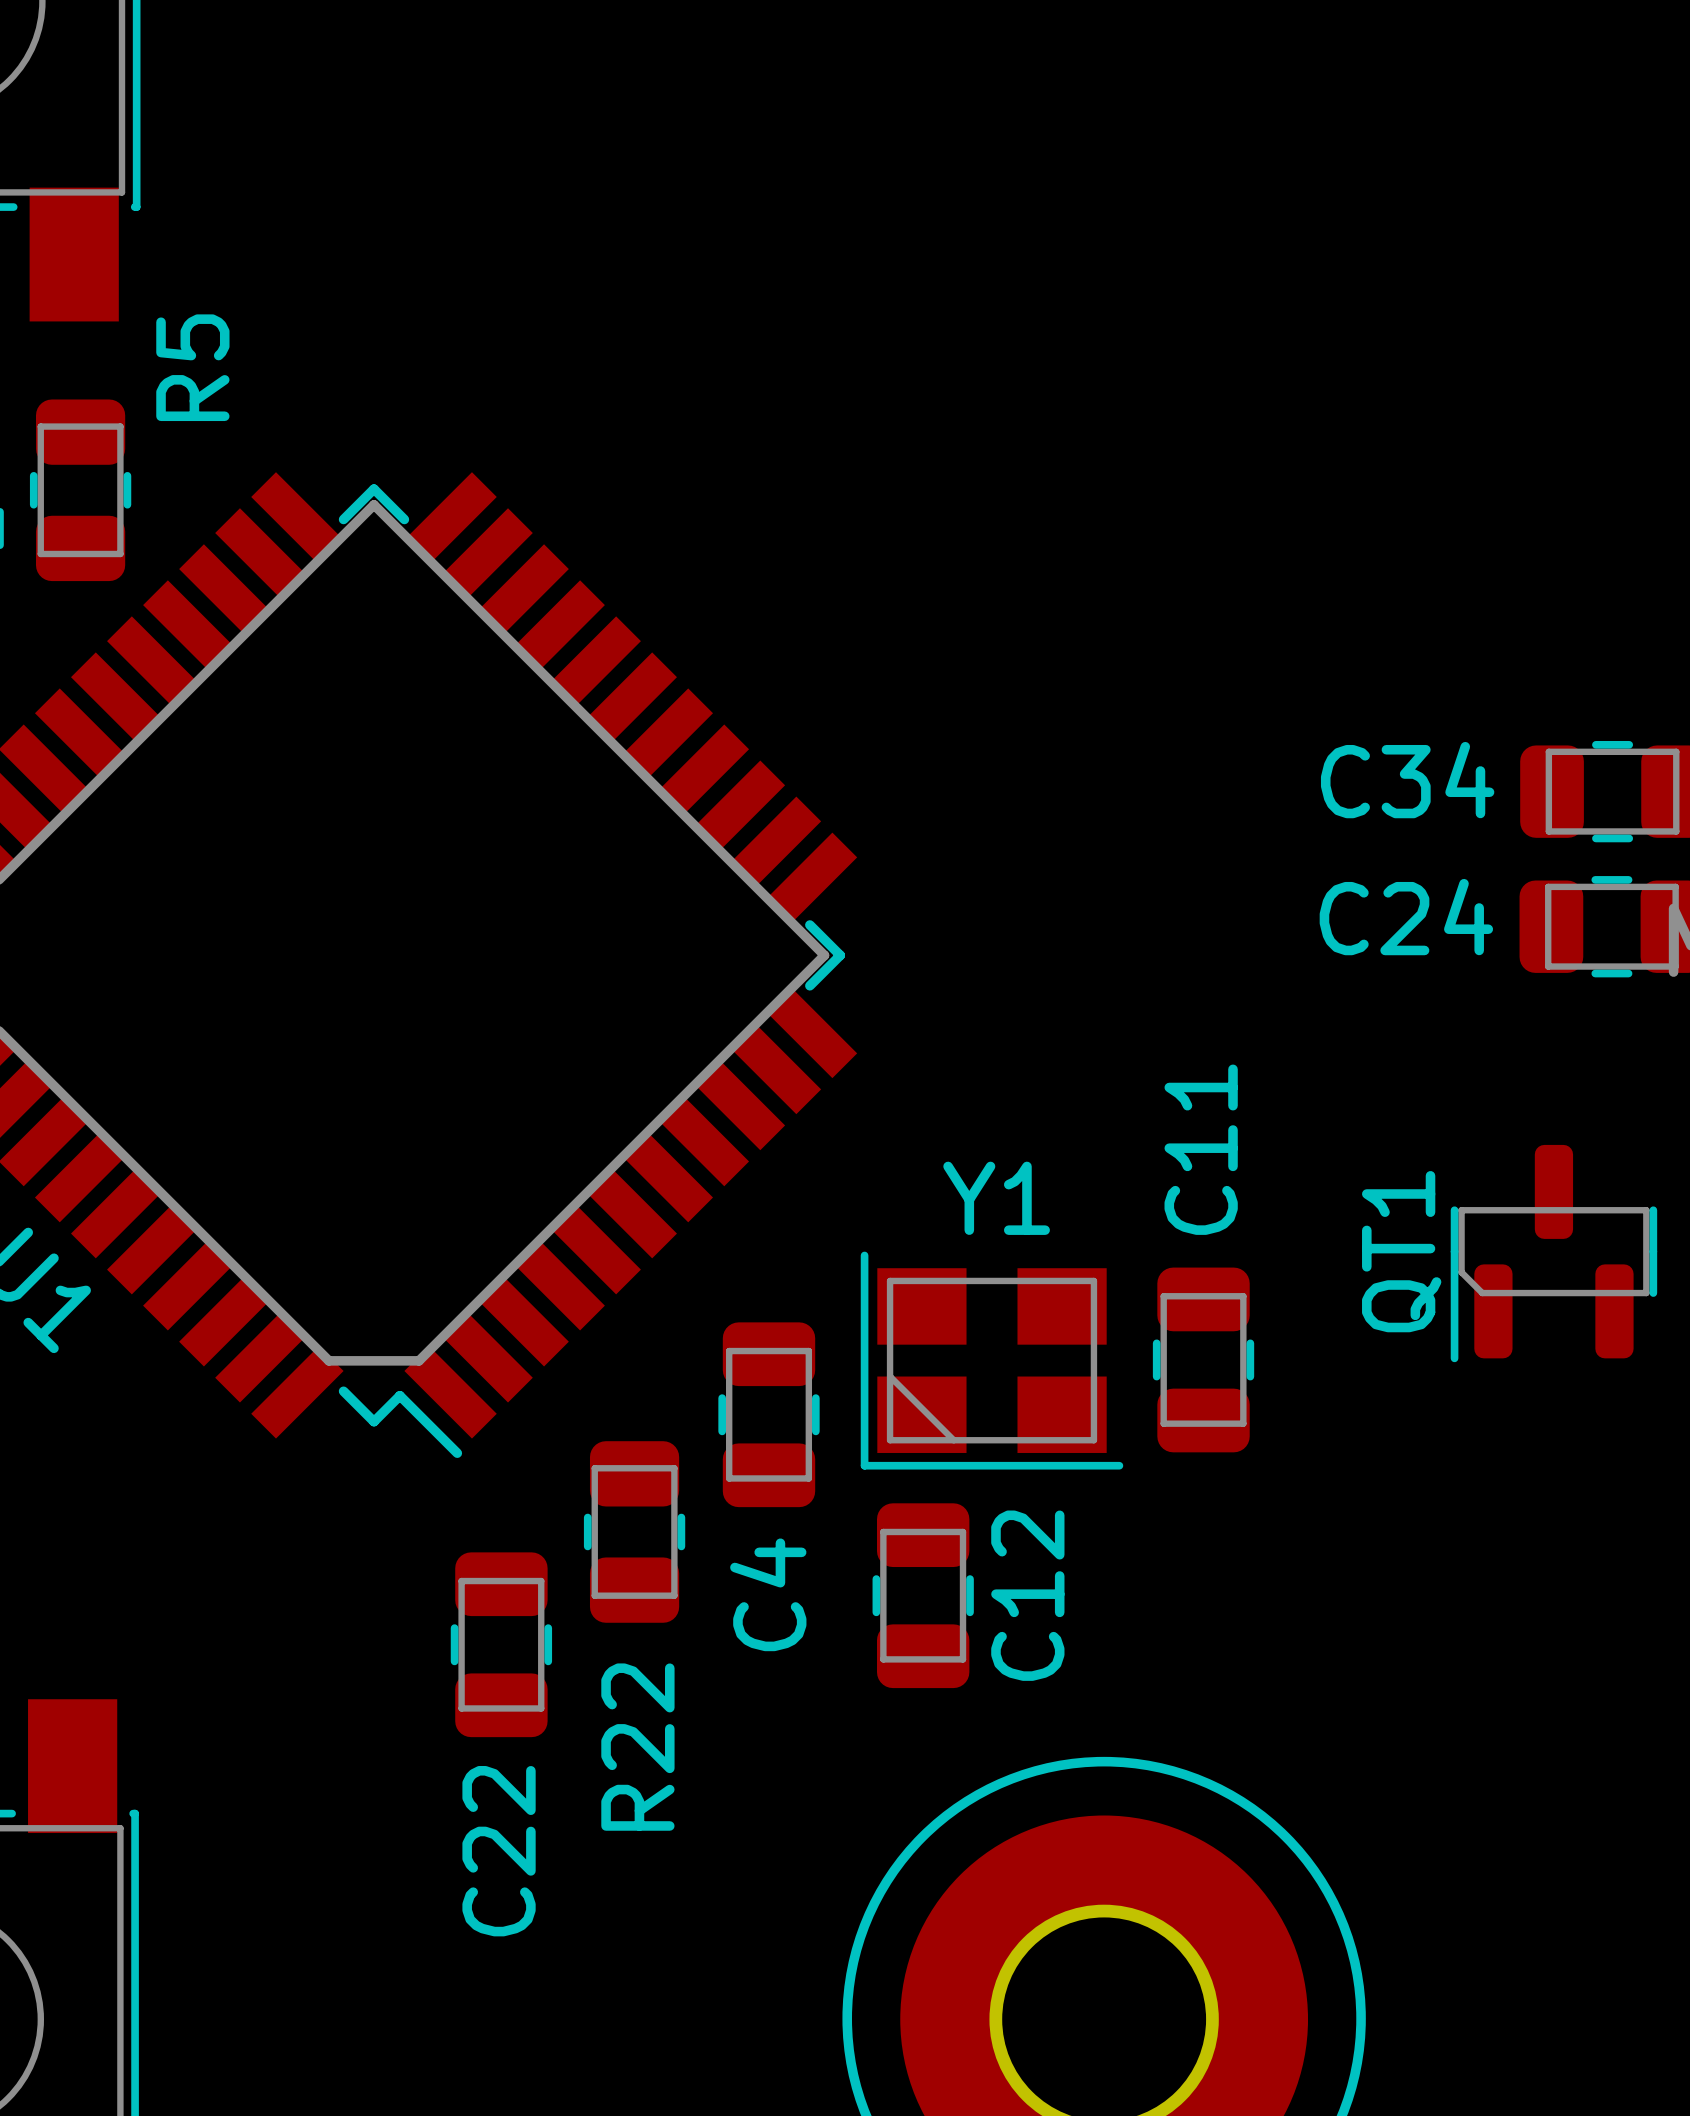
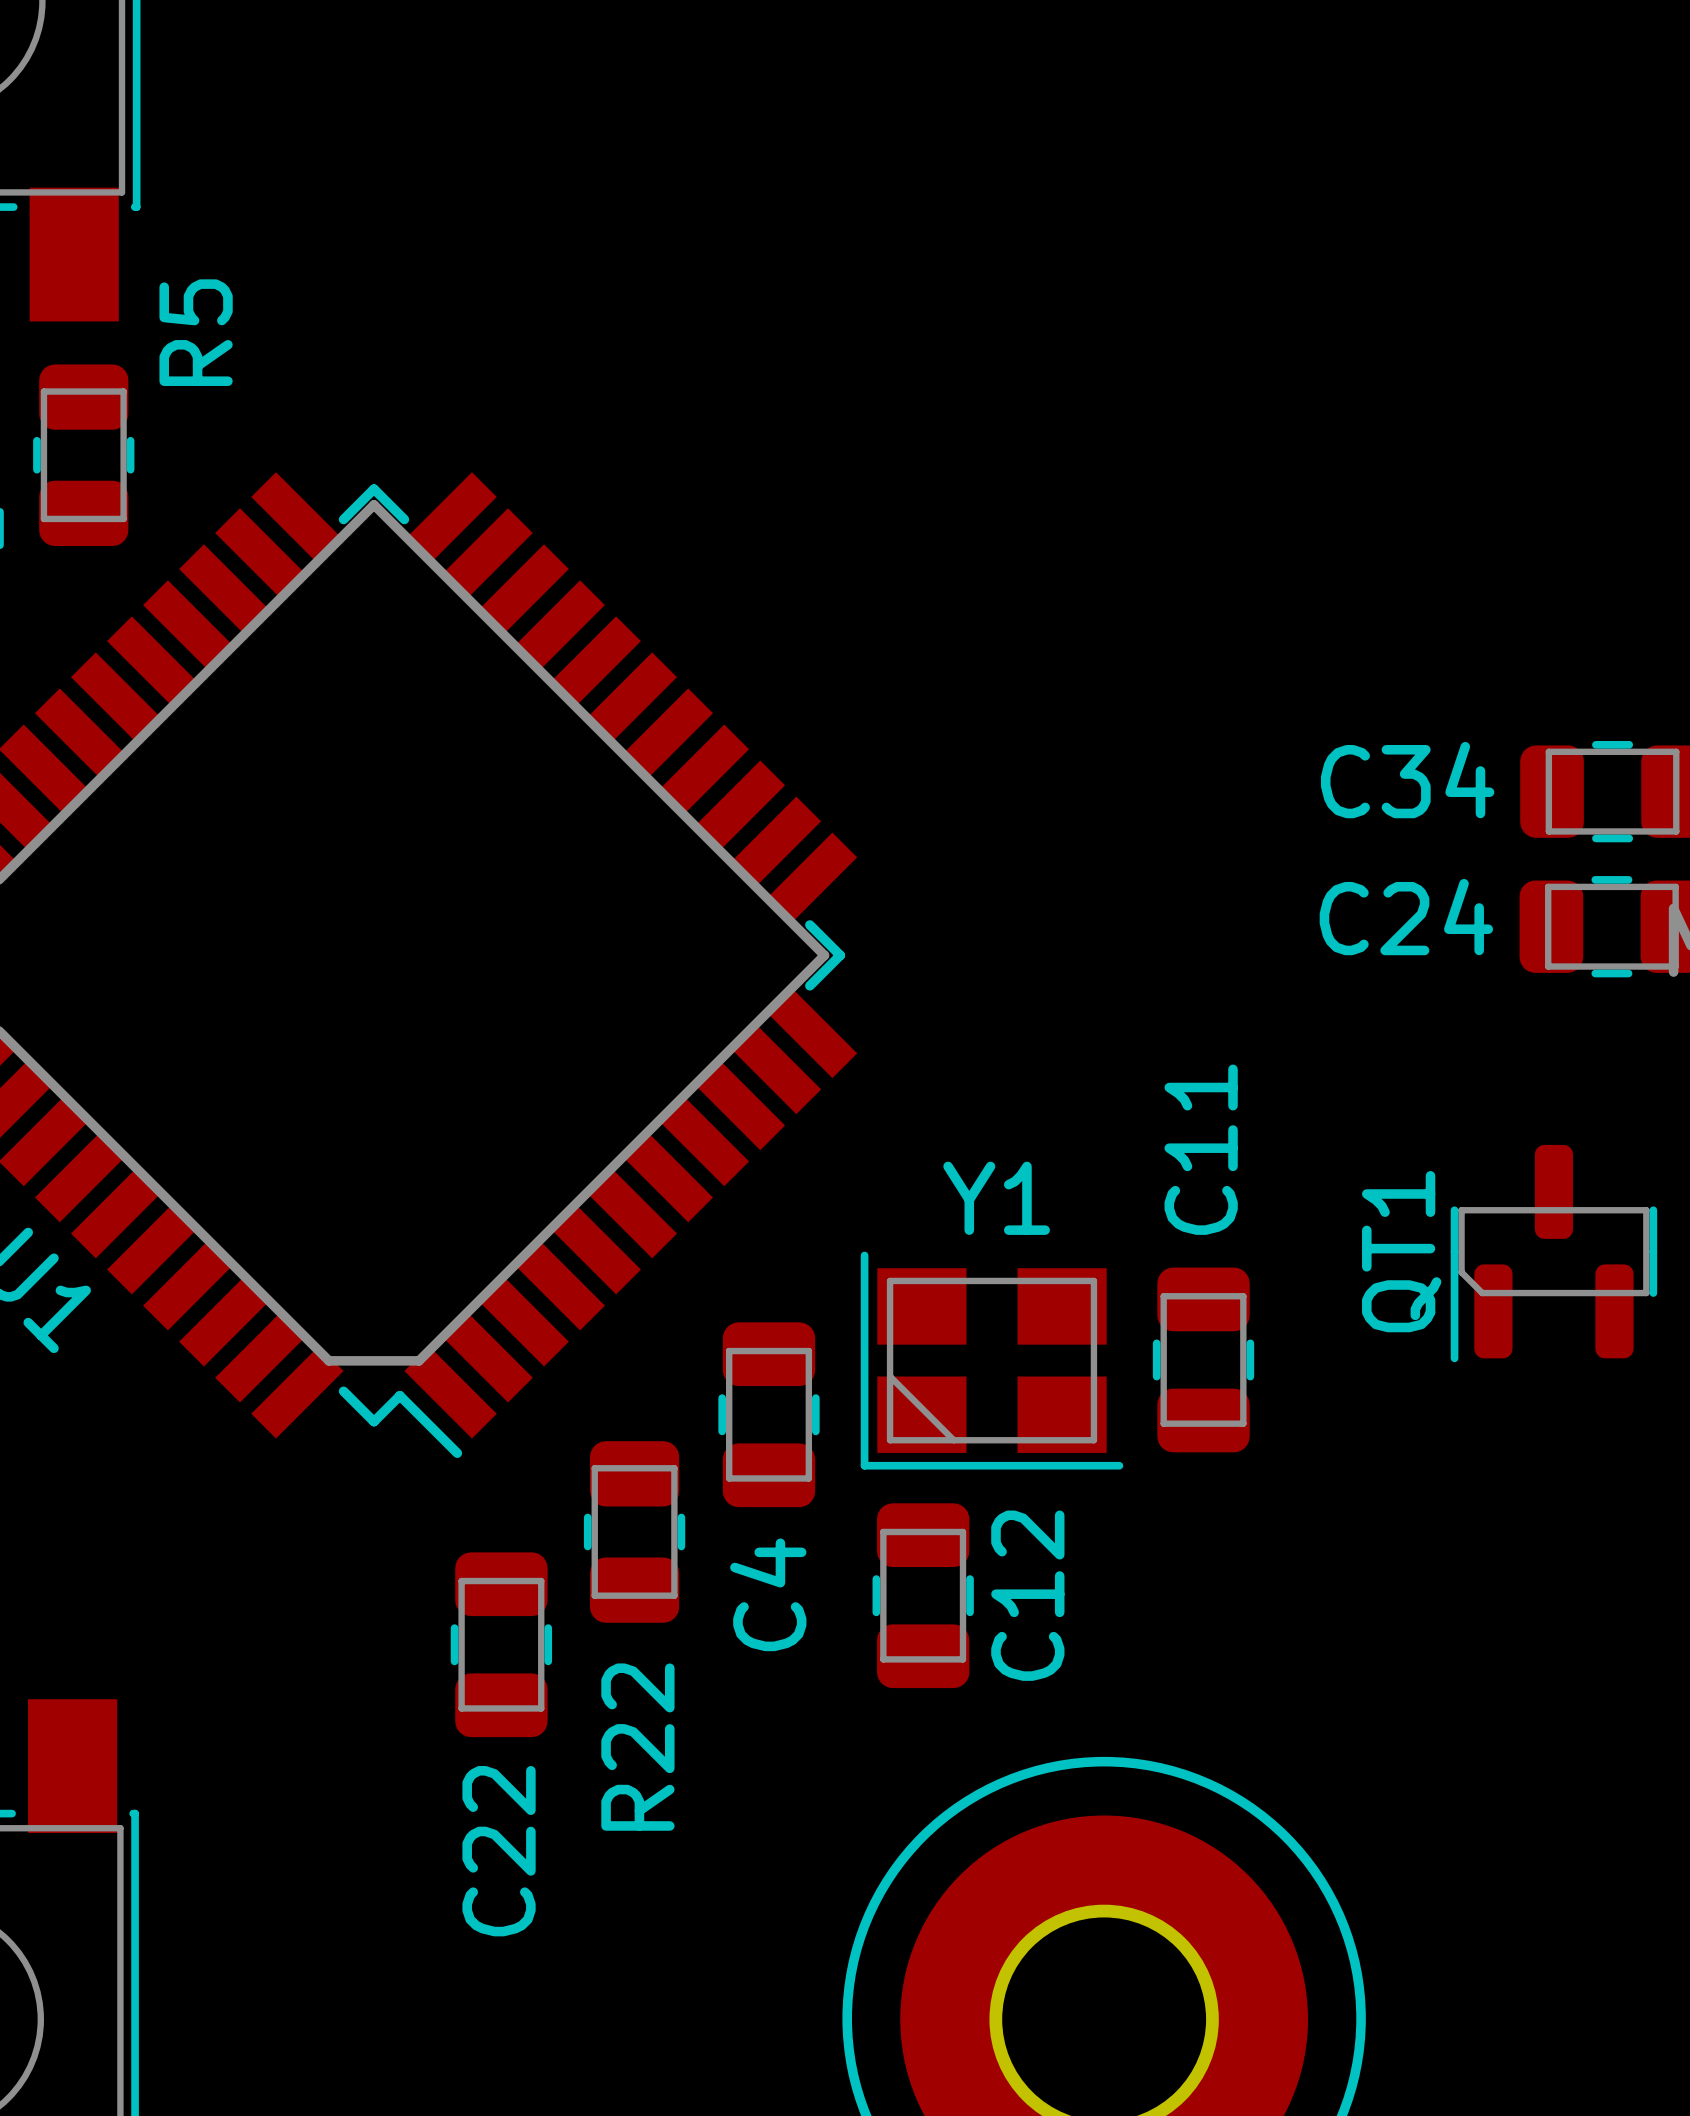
R5 position: (80, 490) -> (83, 455)

